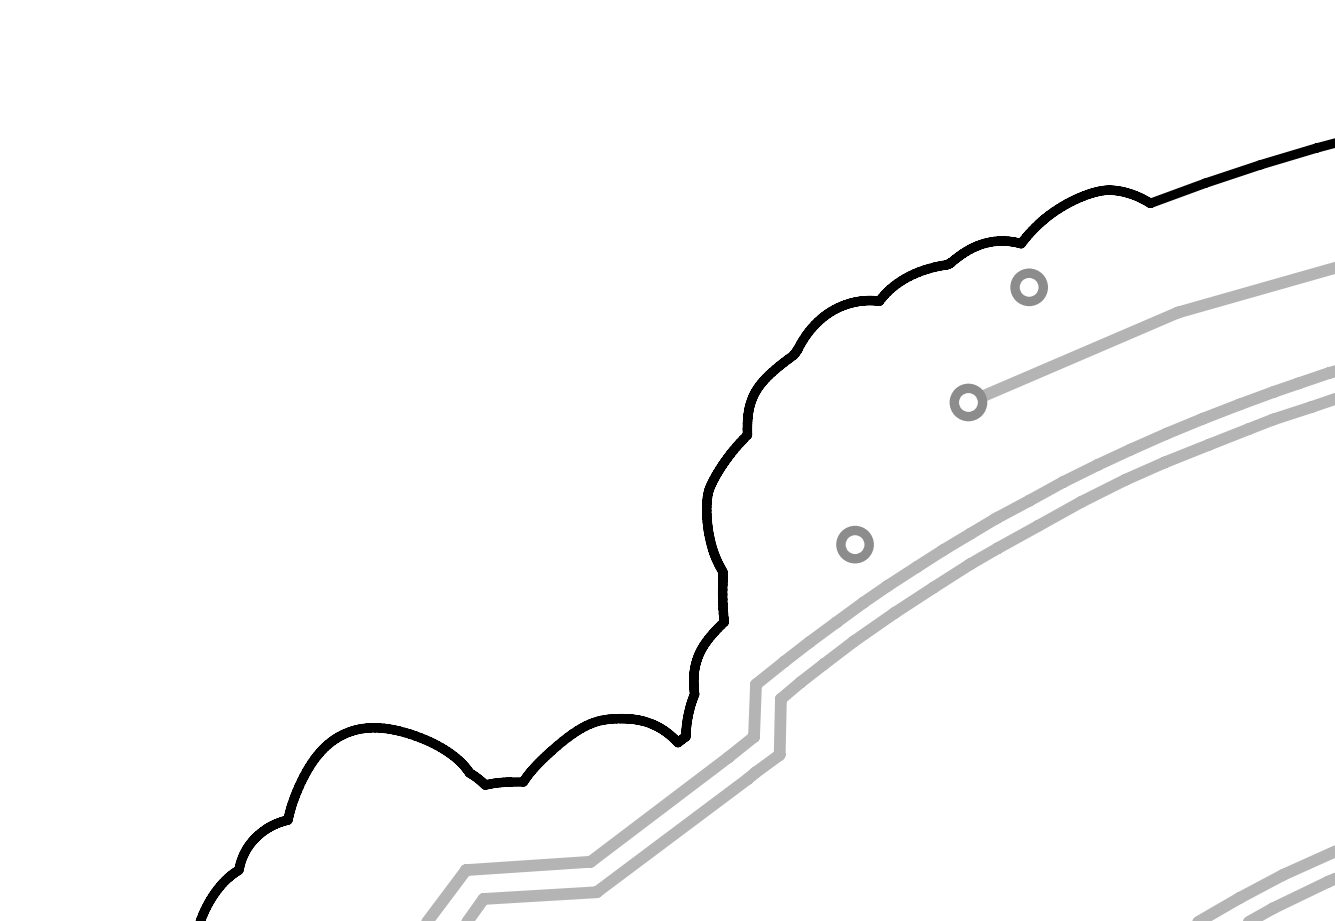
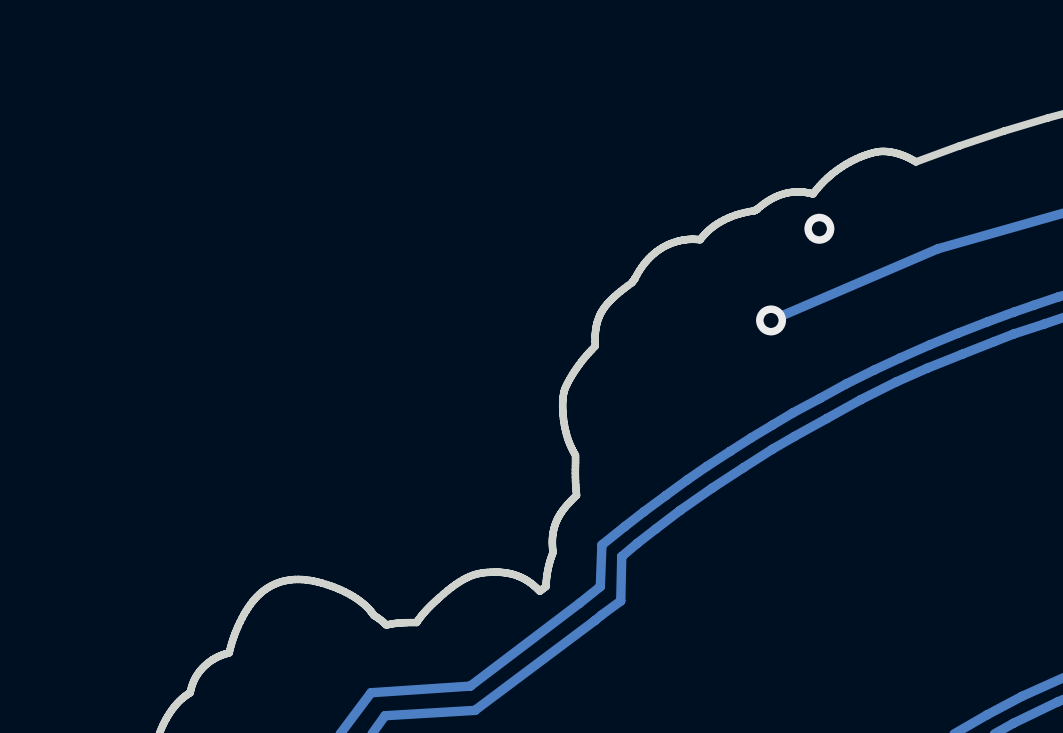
via: (855, 544) -> none

